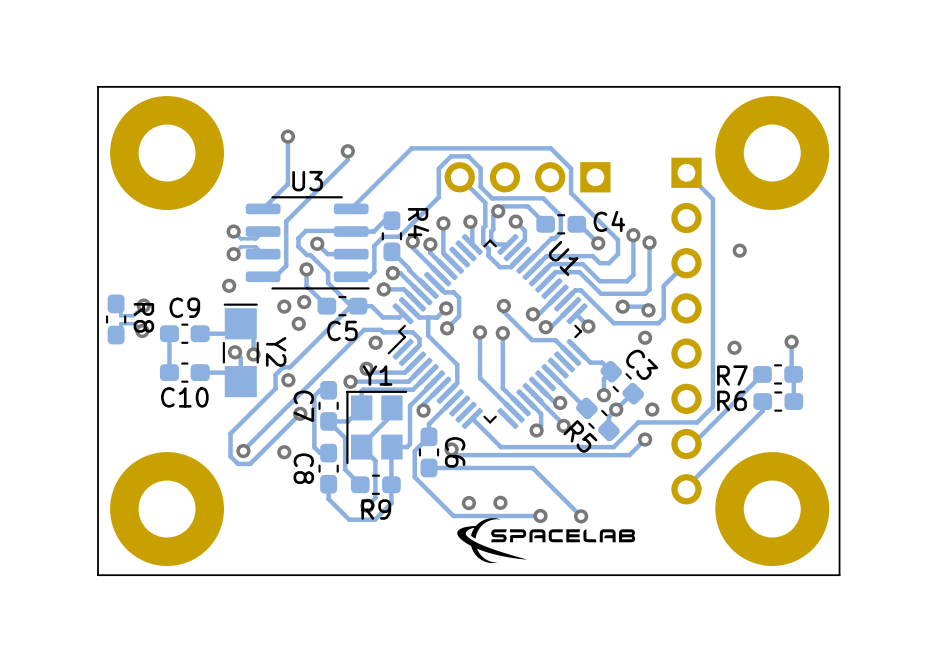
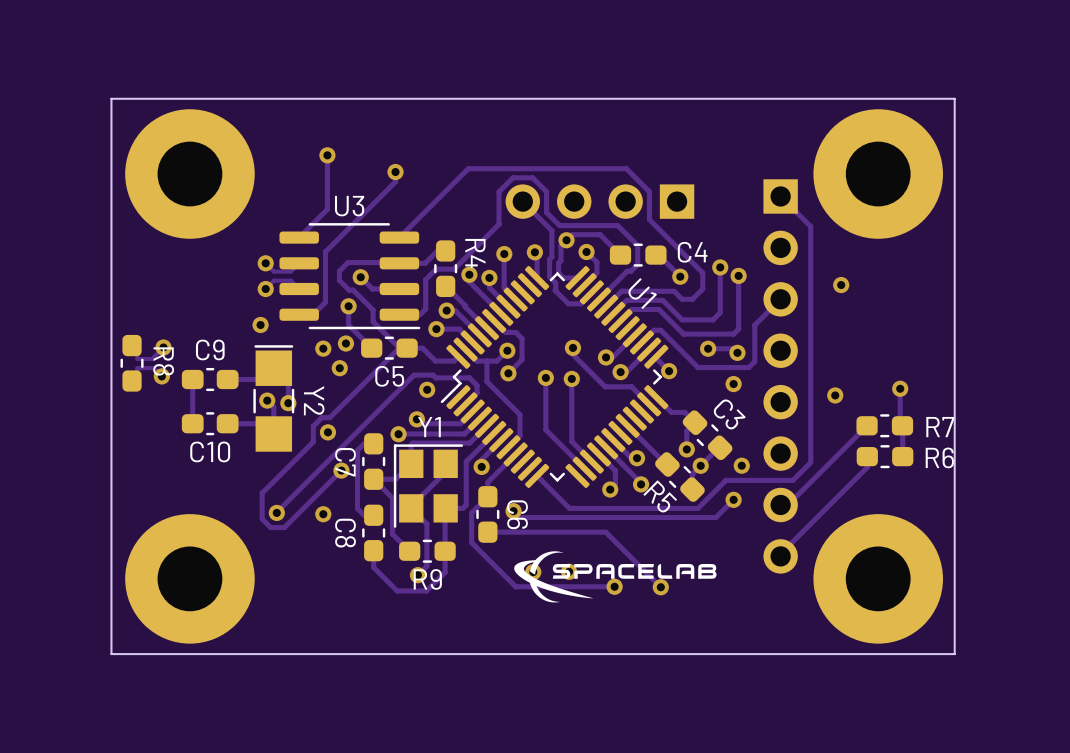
R7 name position: R7 (732, 375) -> R7 (940, 427)
R6 name position: R6 (732, 400) -> R6 (939, 457)
drawing position: (546, 540) -> (615, 576)

